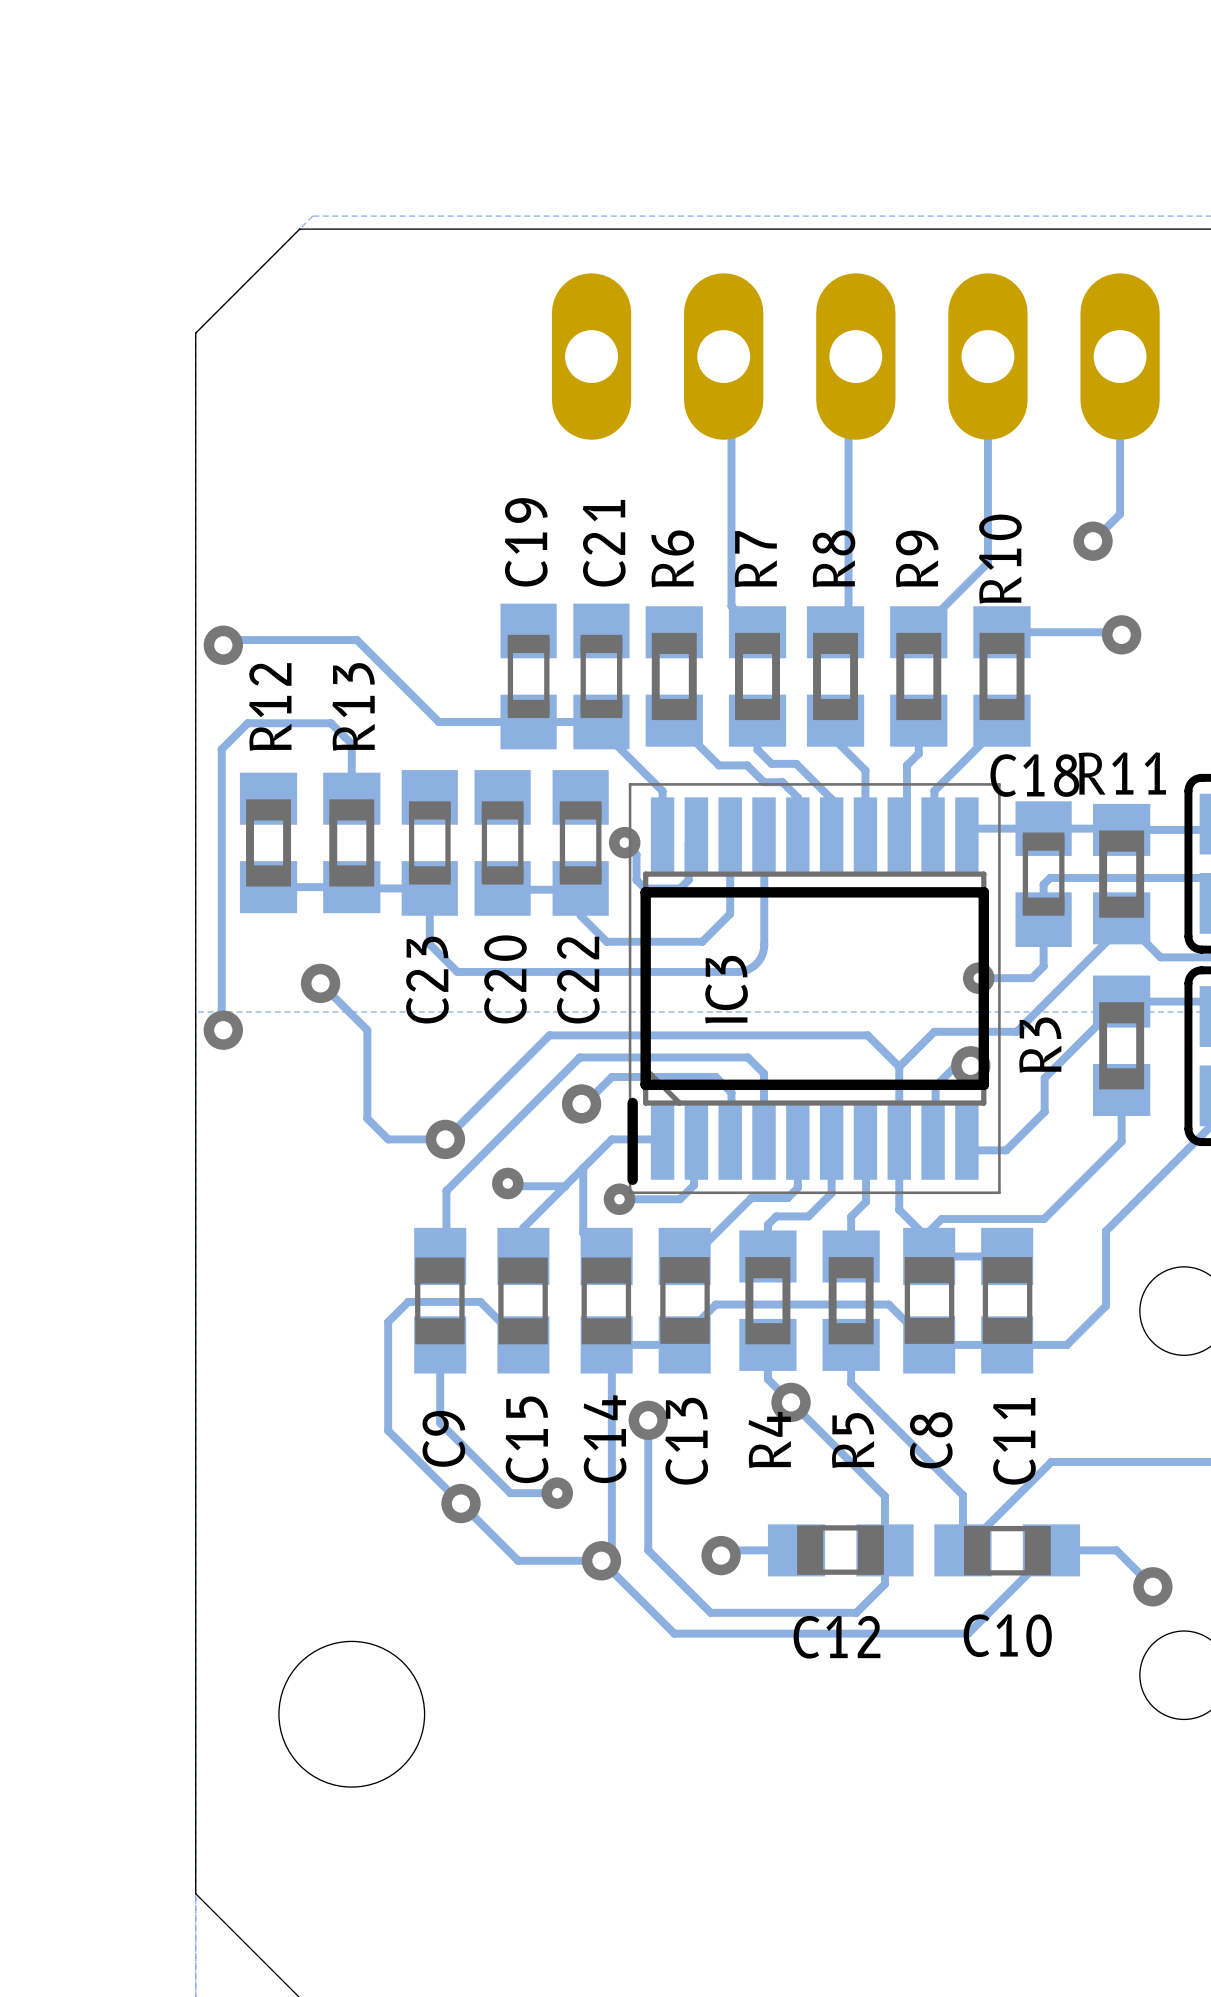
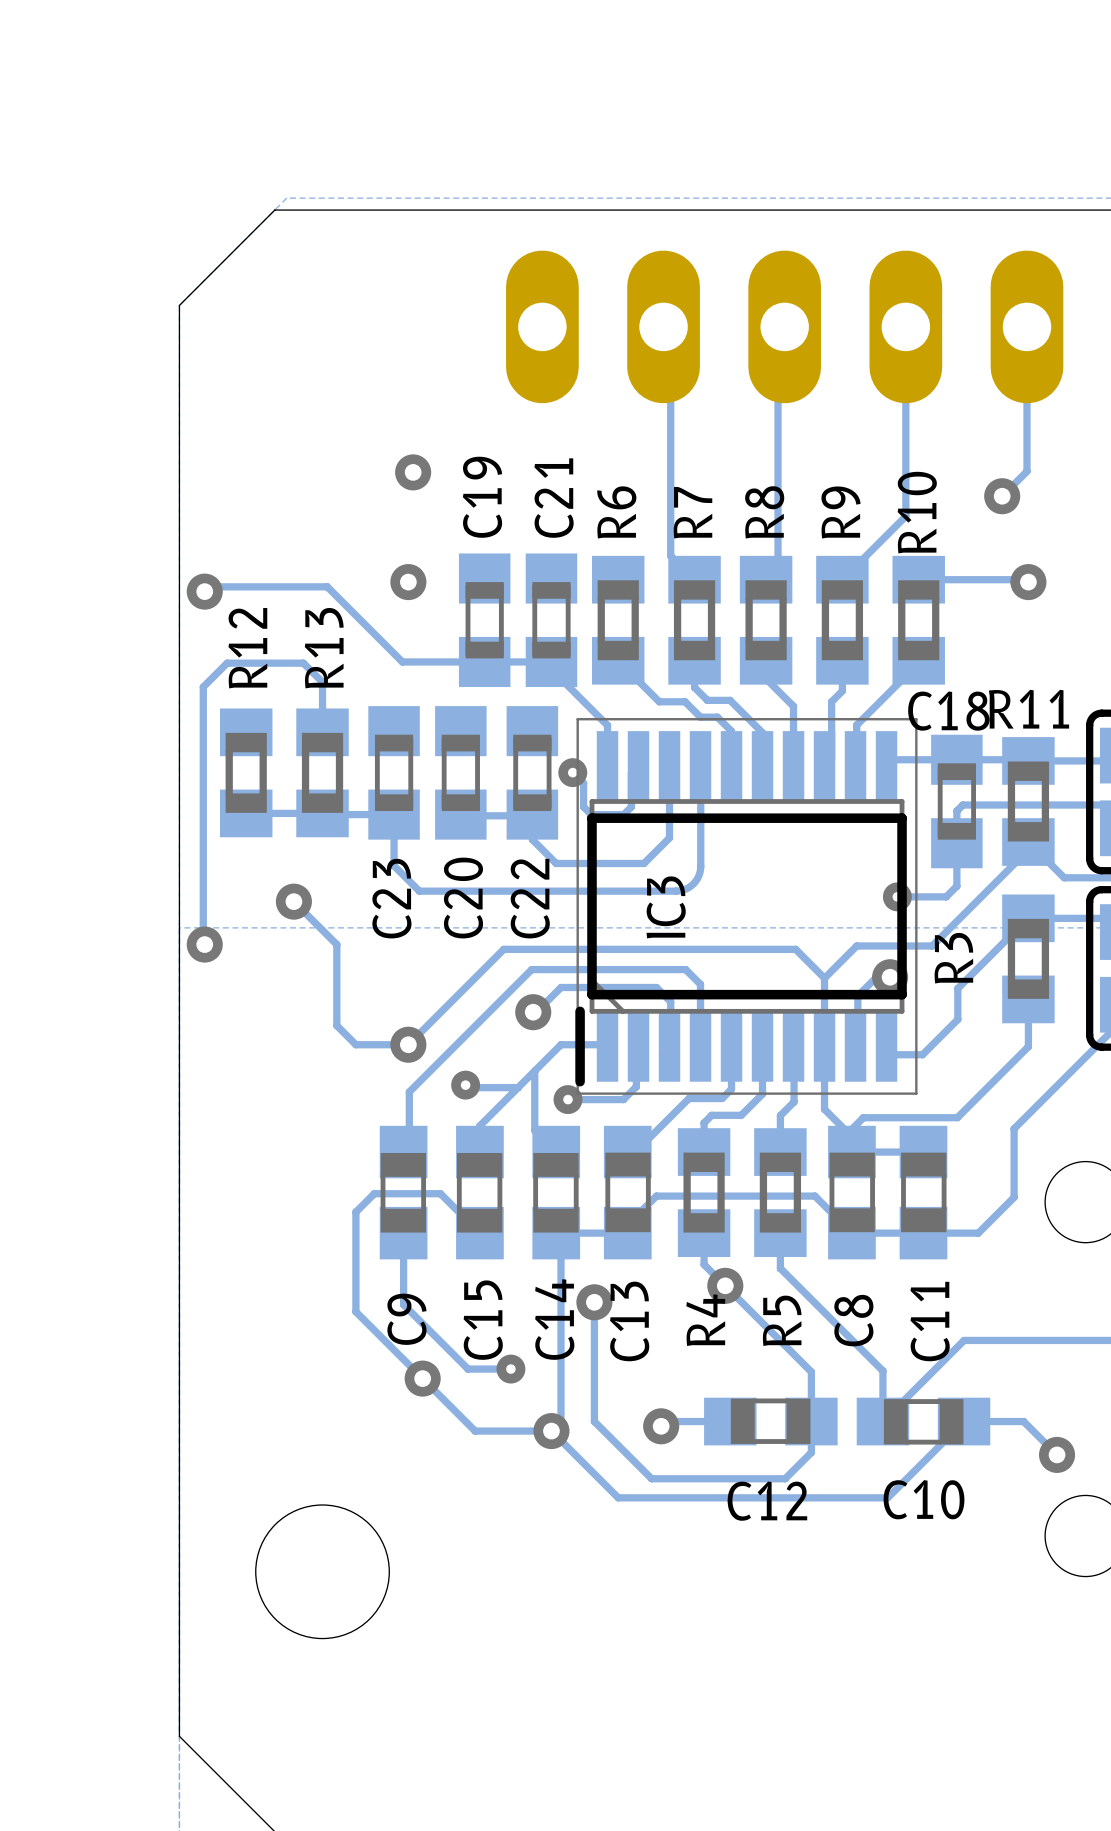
via: none -> (413, 472)
via: none -> (408, 582)

